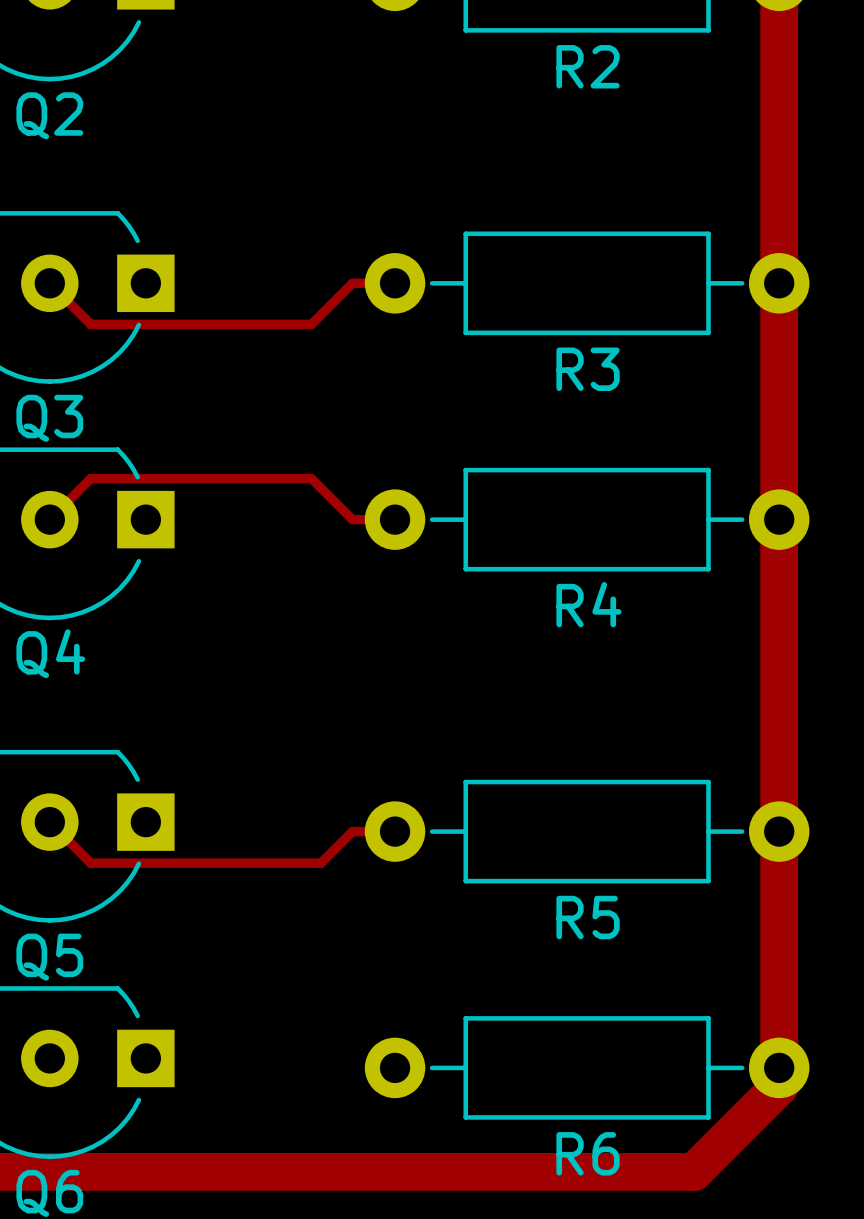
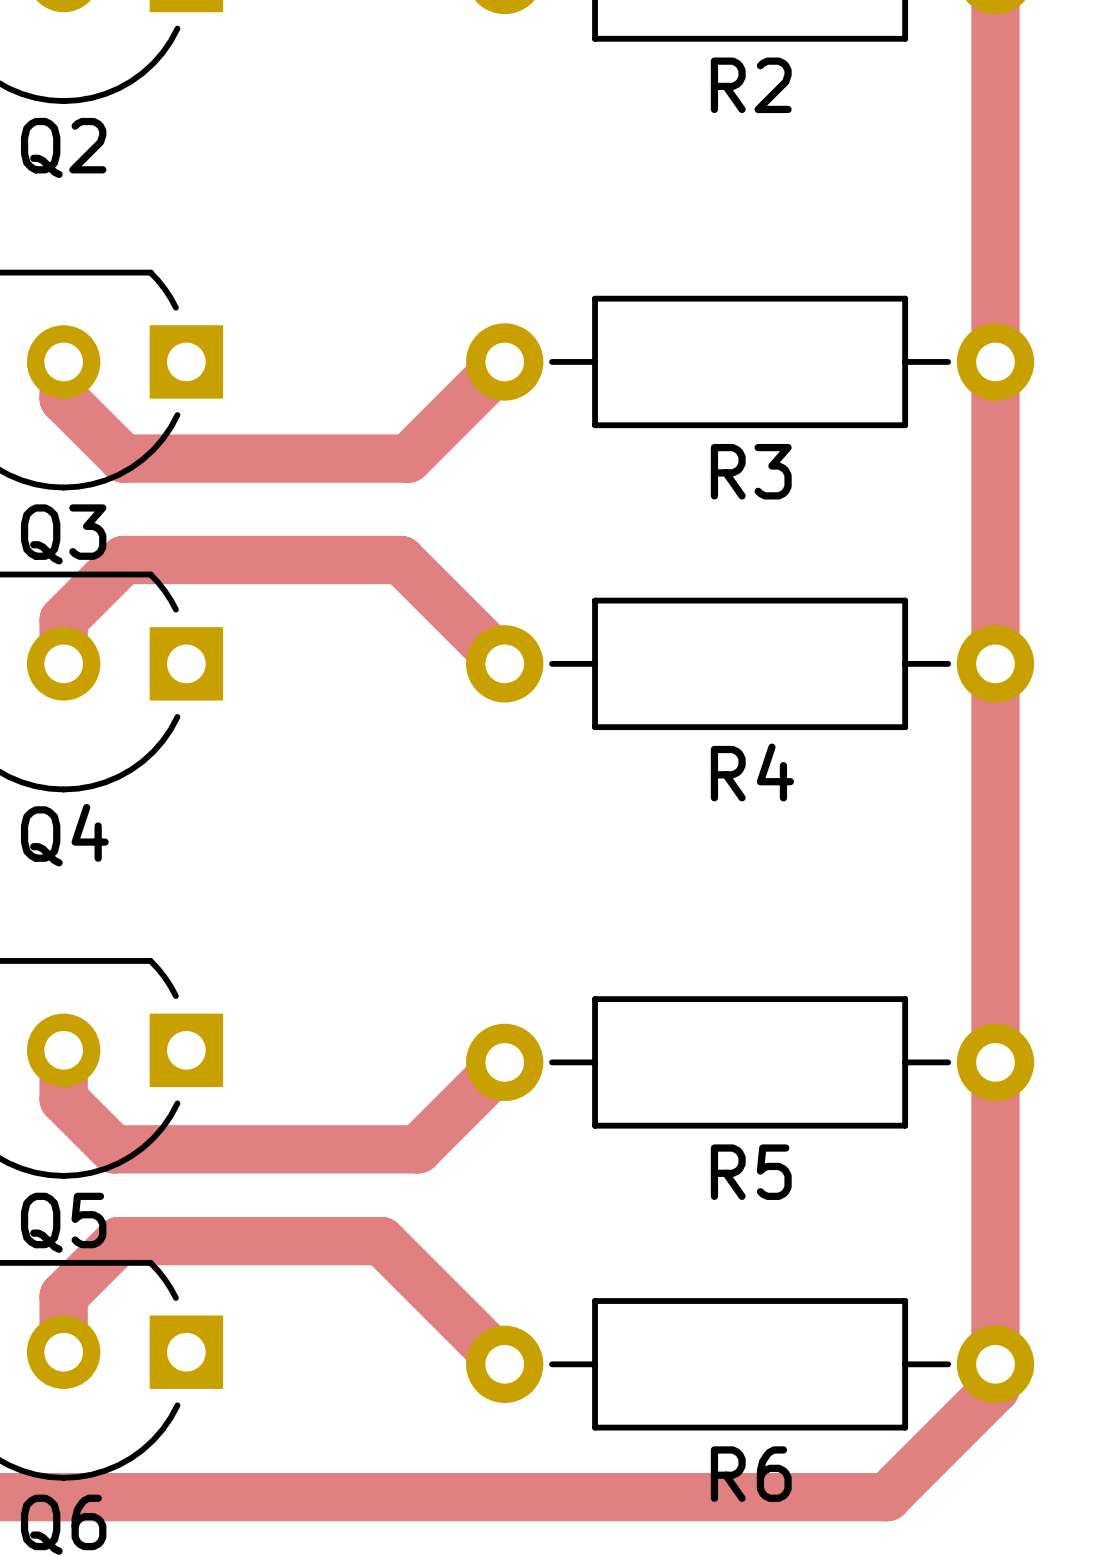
track: (49, 283) (90, 324) (311, 324) (352, 283) (395, 283) -> (63, 361) (63, 398) (123, 458) (408, 458) (504, 361)
track: (49, 519) (90, 478) (311, 478) (352, 519) (395, 519) -> (63, 663) (63, 619) (123, 560) (400, 560) (504, 663)
track: (49, 822) (90, 863) (320, 863) (352, 831) (395, 831) -> (63, 1050) (63, 1099) (113, 1149) (417, 1149) (504, 1062)
track: none -> (63, 1352) (63, 1296) (118, 1241) (381, 1241) (504, 1364)

